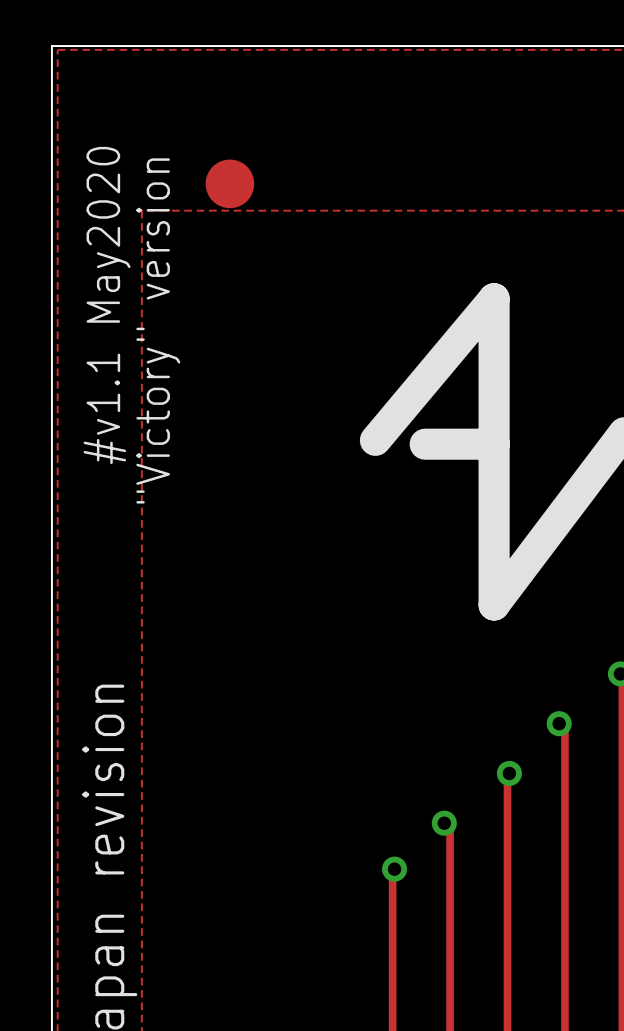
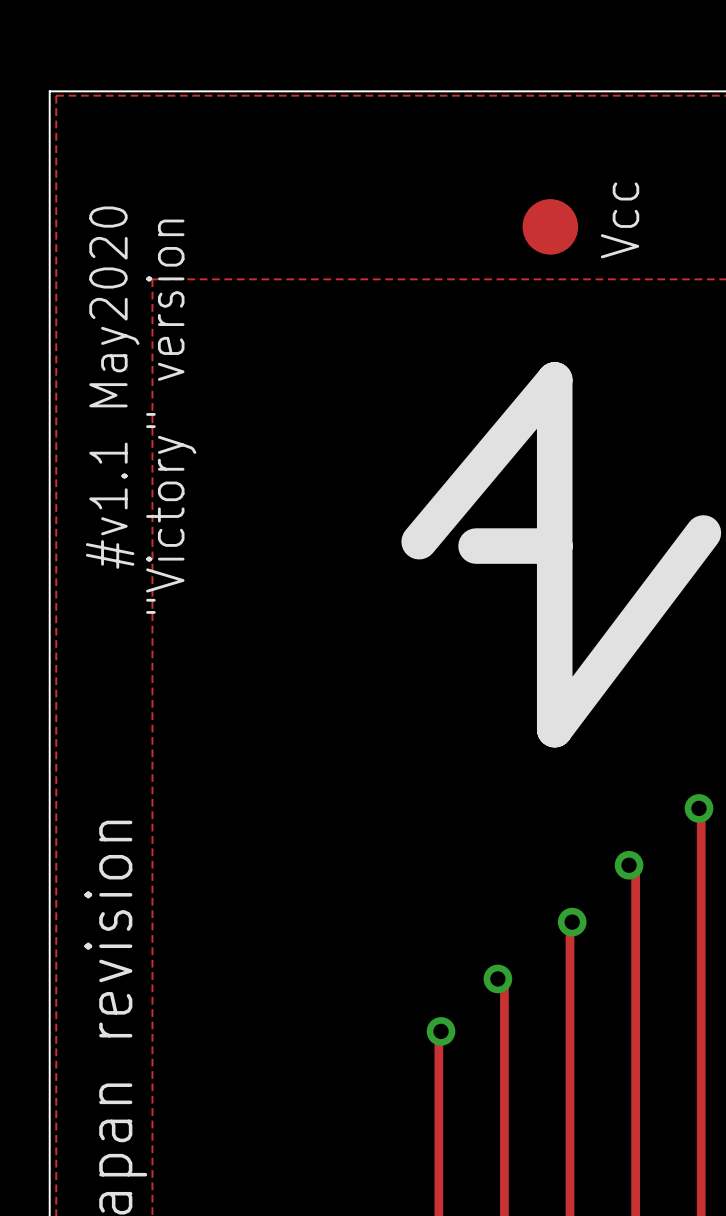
text: none -> Vcc (620, 220)
part position: (229, 183) -> (550, 226)

